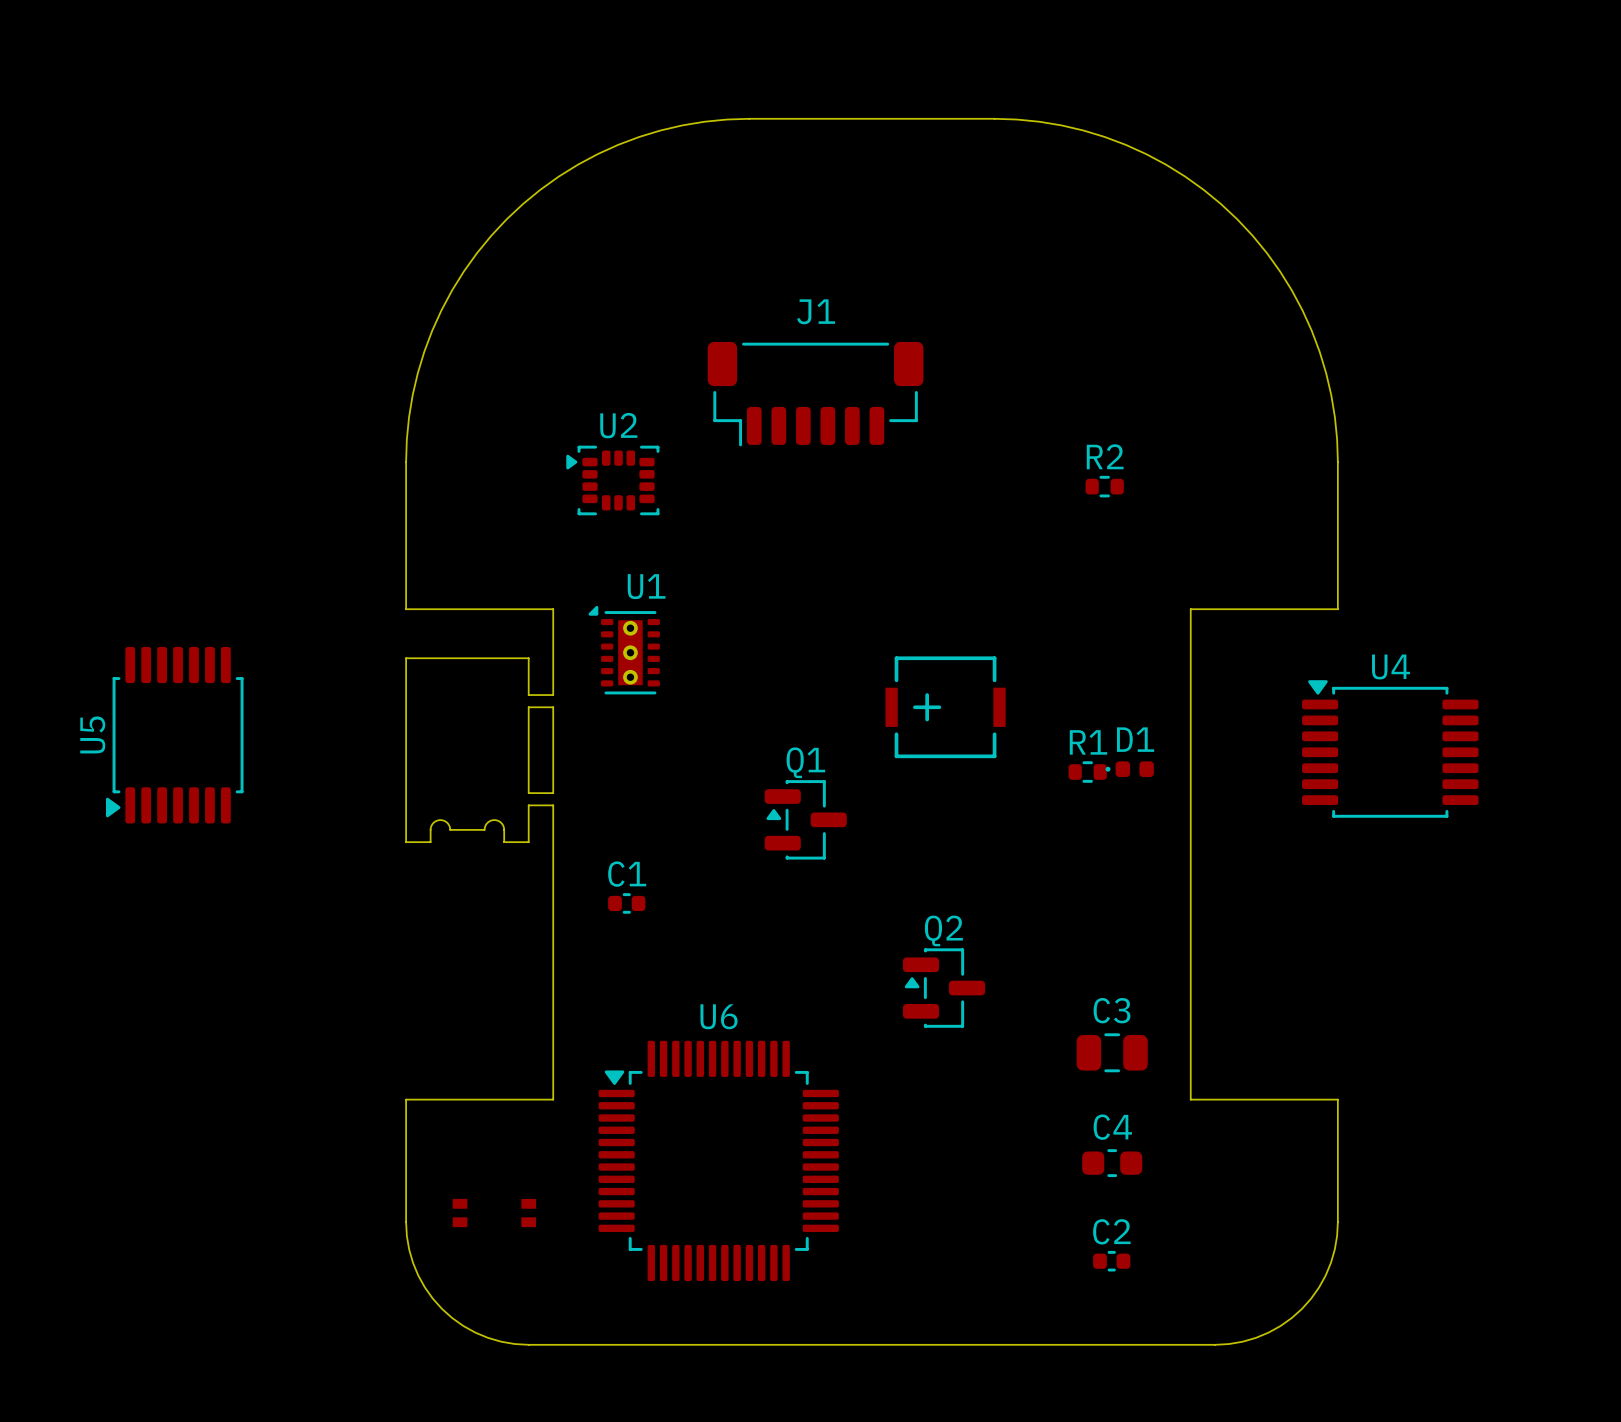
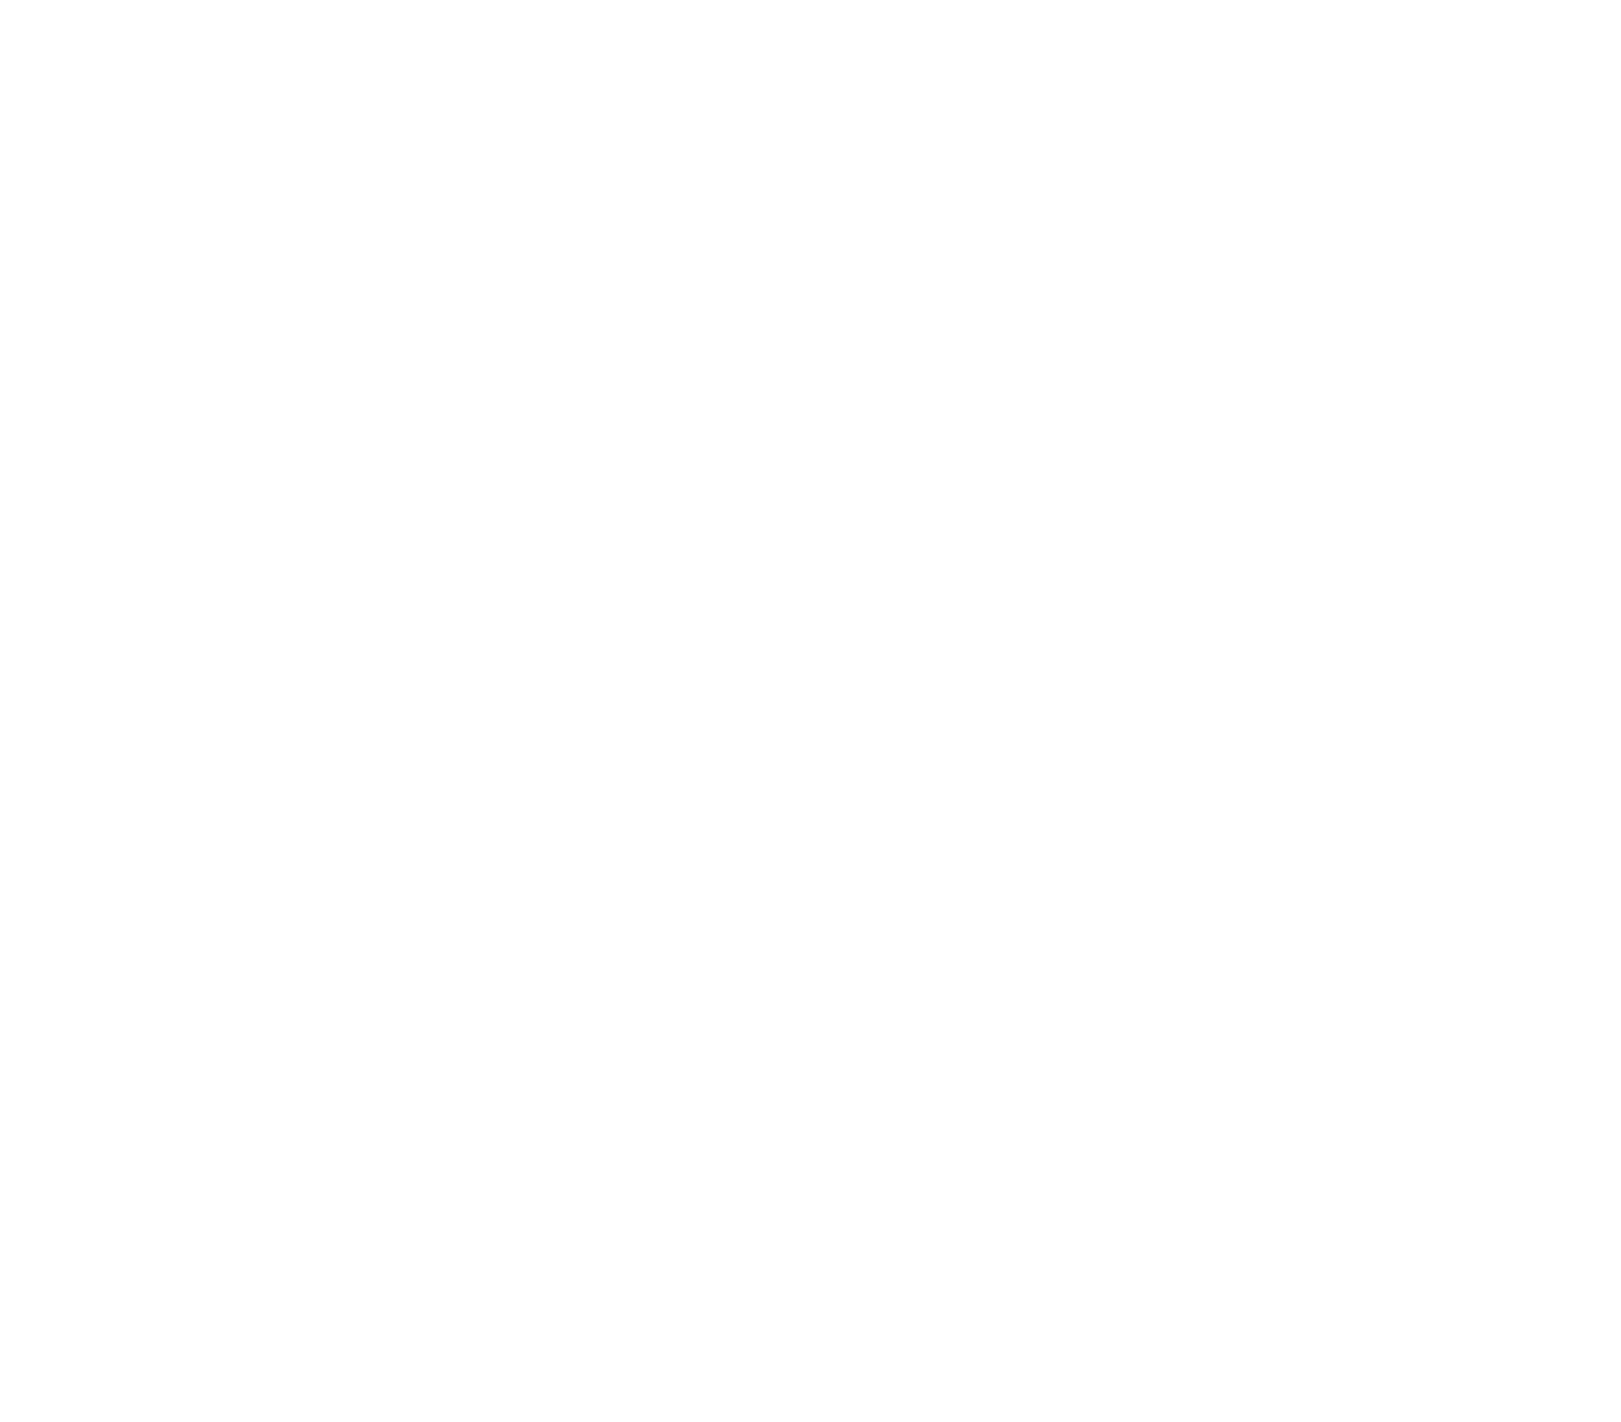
board edge: (749, 118) (1017, 119) (1083, 130) (1125, 144) (1185, 176) (1237, 219) (1280, 271) (1311, 330) (1326, 373) (1337, 439) (1337, 609) (1190, 609) (1190, 1099) (1337, 1099) (1337, 1222) (1337, 1235) (1330, 1262) (1325, 1275) (1311, 1298) (1291, 1318) (1268, 1332) (1242, 1341) (1215, 1344) (514, 1344) (488, 1337) (463, 1326) (442, 1308) (432, 1298) (418, 1275) (409, 1249) (406, 1235) (406, 1099) (553, 1099) (553, 805) (528, 805) (528, 842) (504, 842) (503, 826) (496, 820) (487, 822) (484, 829) (450, 829) (447, 823) (440, 820) (434, 821) (431, 826) (430, 842) (406, 842) (406, 658) (528, 658) (528, 695) (553, 695) (553, 609) (406, 609) (406, 439) (417, 373) (441, 310) (463, 271) (491, 235) (540, 189) (577, 164) (639, 137) (704, 121) (749, 118) -> none
J1: (815, 394) -> none
U2: (612, 480) -> none
R2: (1104, 486) -> none
U1: (624, 650) -> none
board edge: (528, 707) (528, 793) (553, 793) (553, 707) (528, 707) -> none
part: (945, 707) -> none
U5: (174, 735) -> none
U4: (1390, 748) -> none
D1: (1129, 769) -> none
R1: (1087, 772) -> none
Q1: (805, 819) -> none
C1: (626, 903) -> none
Q2: (944, 988) -> none
C3: (1112, 1052) -> none
U6: (718, 1160) -> none
C4: (1112, 1163) -> none
part: (494, 1213) -> none
C2: (1111, 1261) -> none

